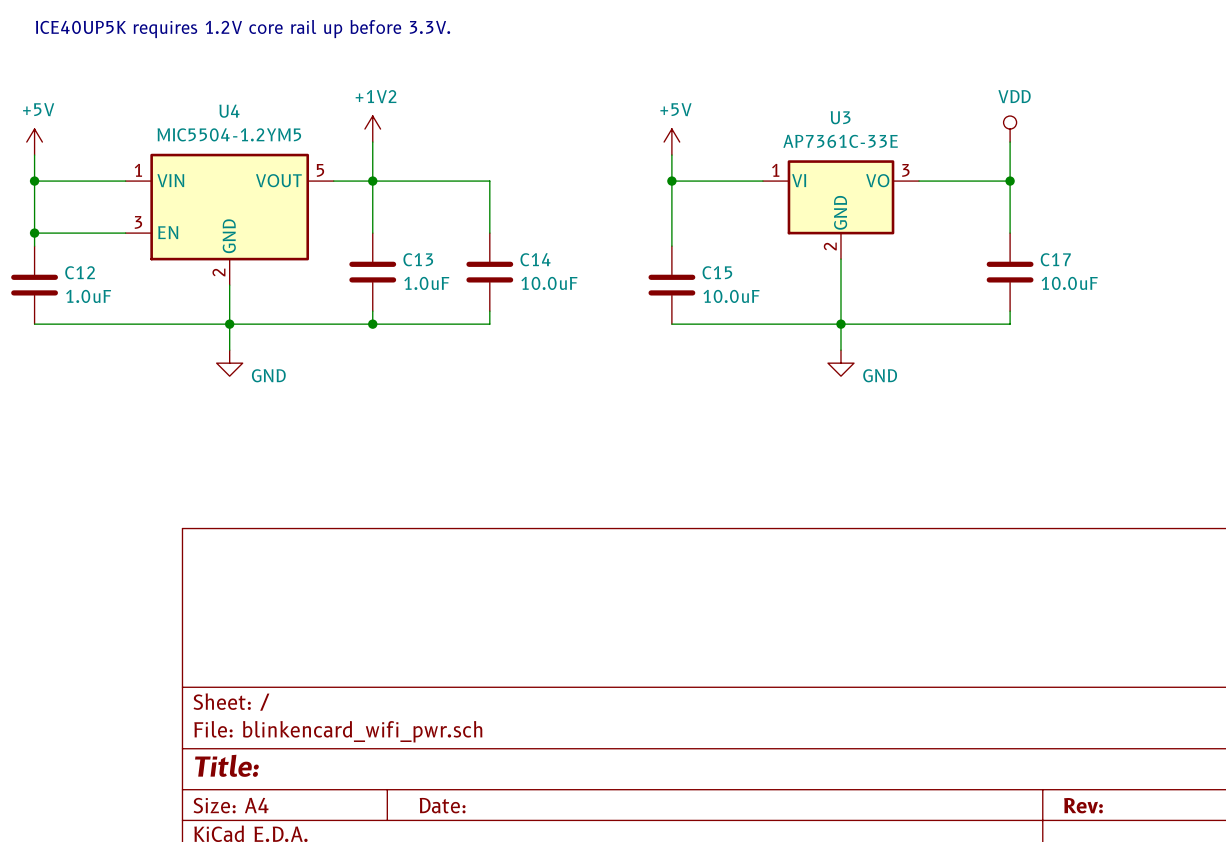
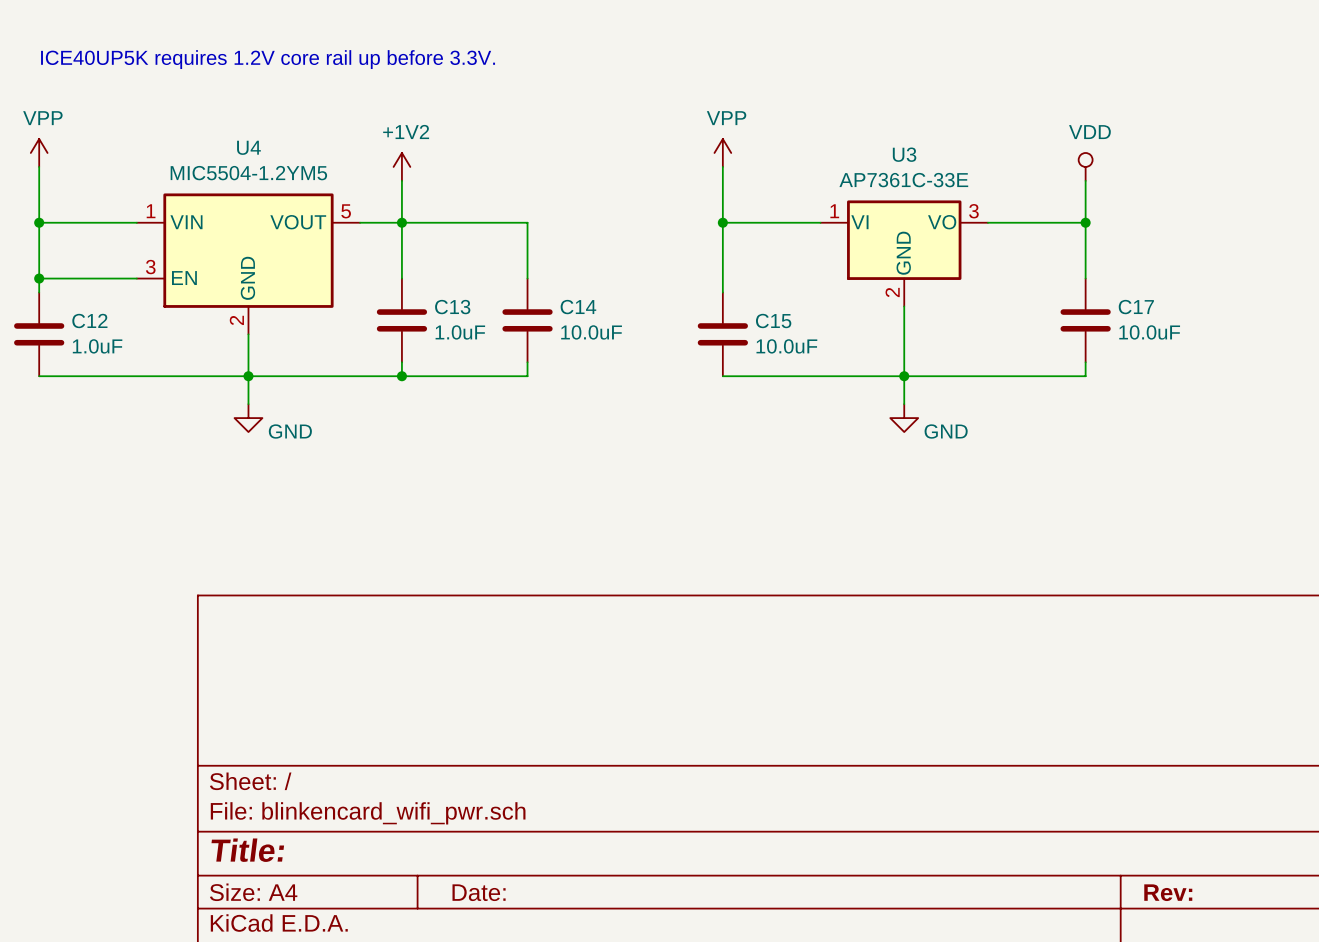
power symbol: none -> VPP (39, 152)
power symbol: none -> VPP (722, 152)
power symbol: +5V (34, 142) -> none
power symbol: +5V (671, 142) -> none

